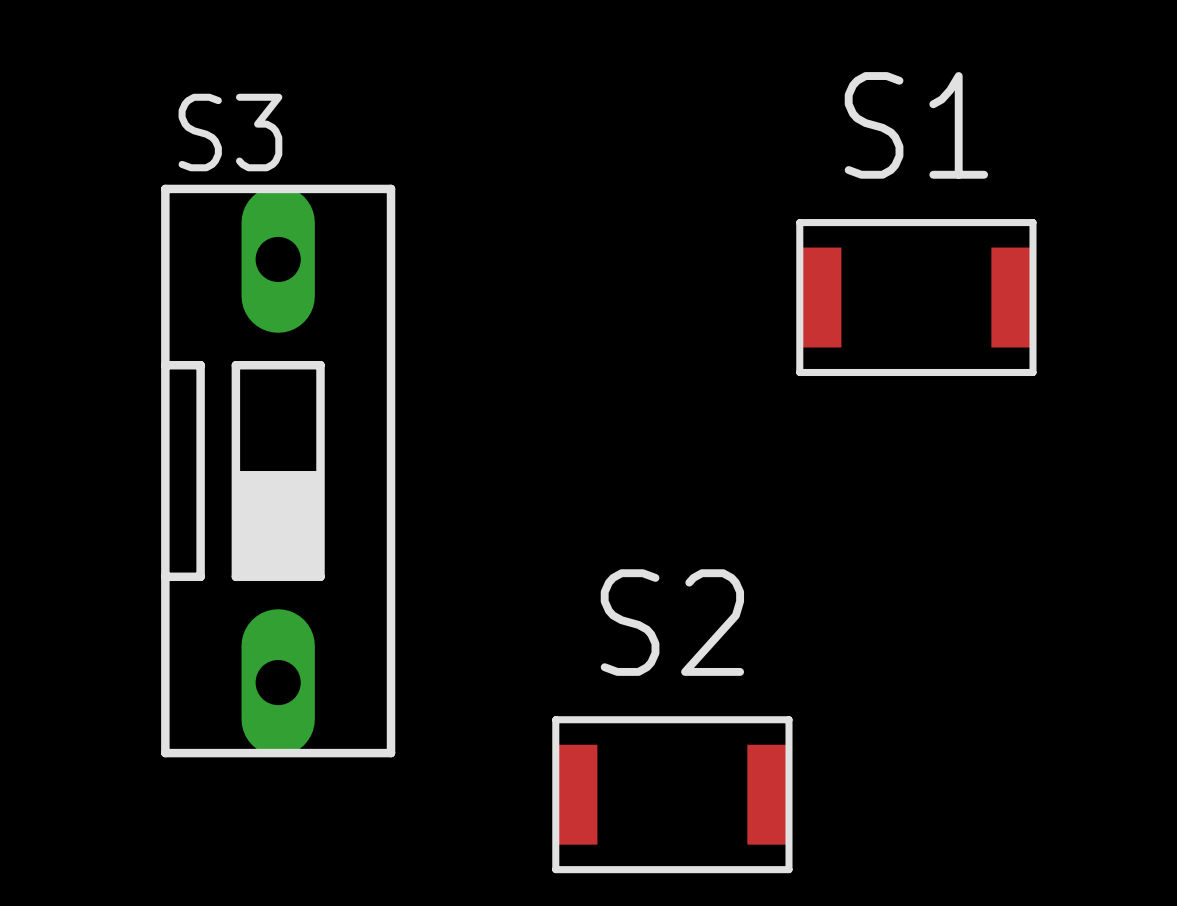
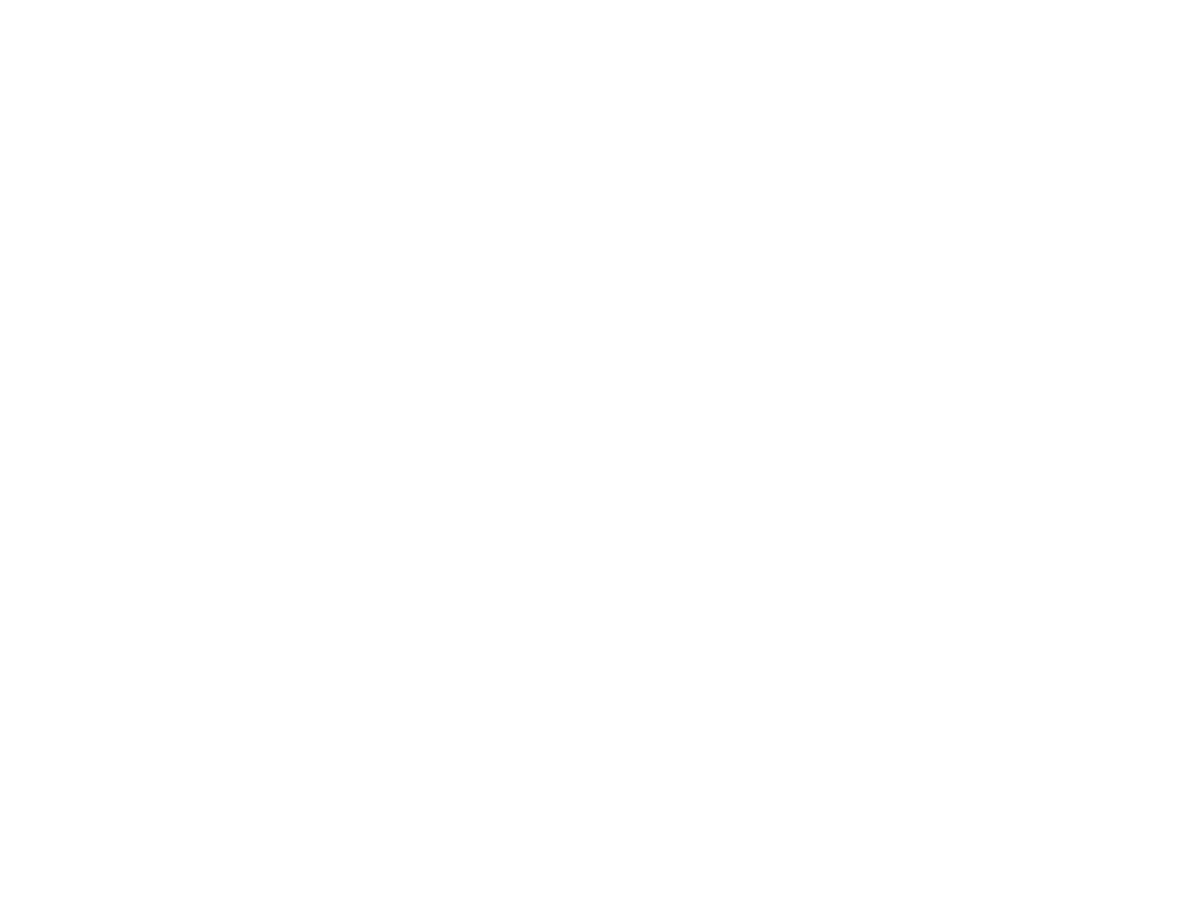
S1: (916, 297) -> none
S3: (278, 471) -> none
S2: (672, 794) -> none

